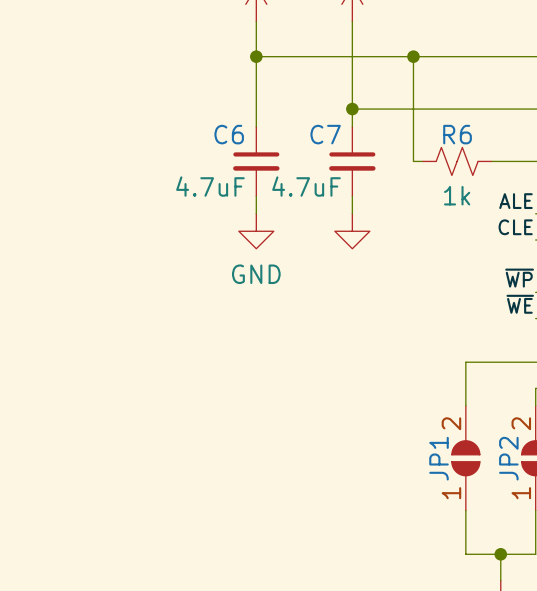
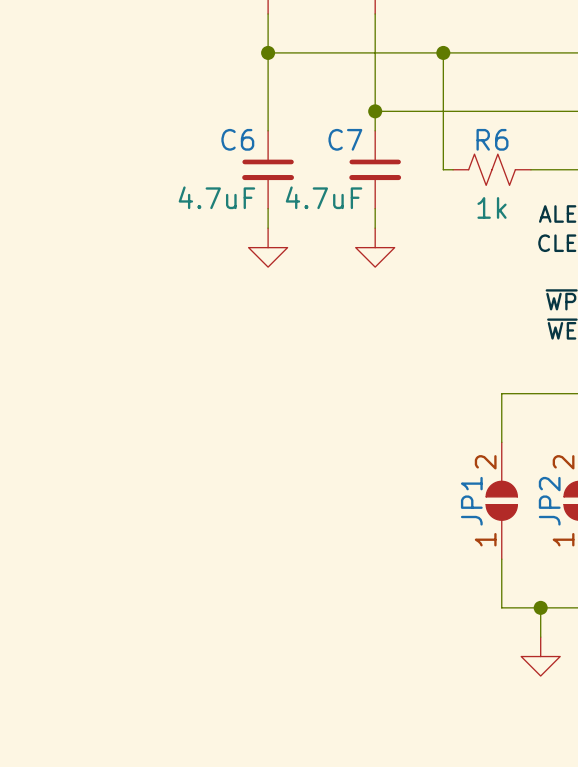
power symbol text: GND (256, 274) -> none

